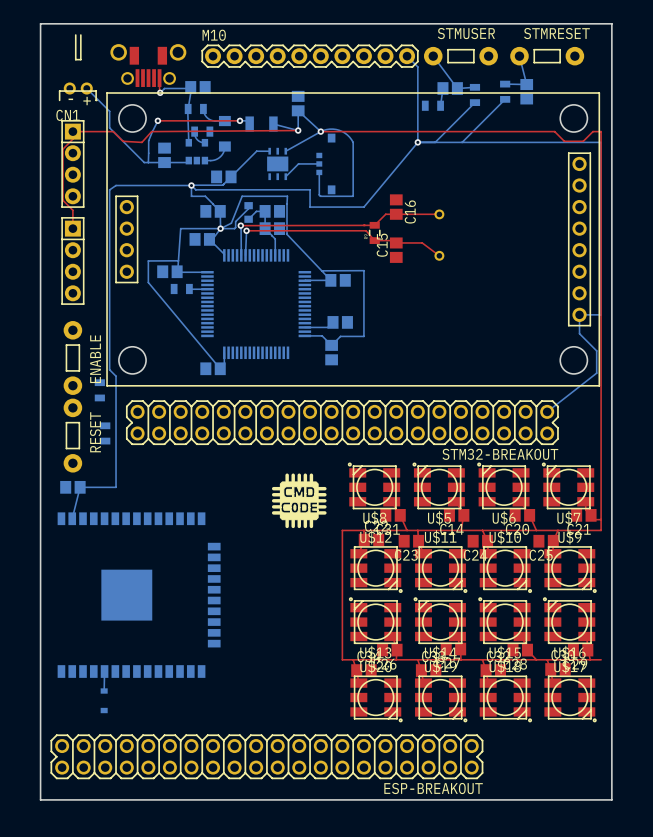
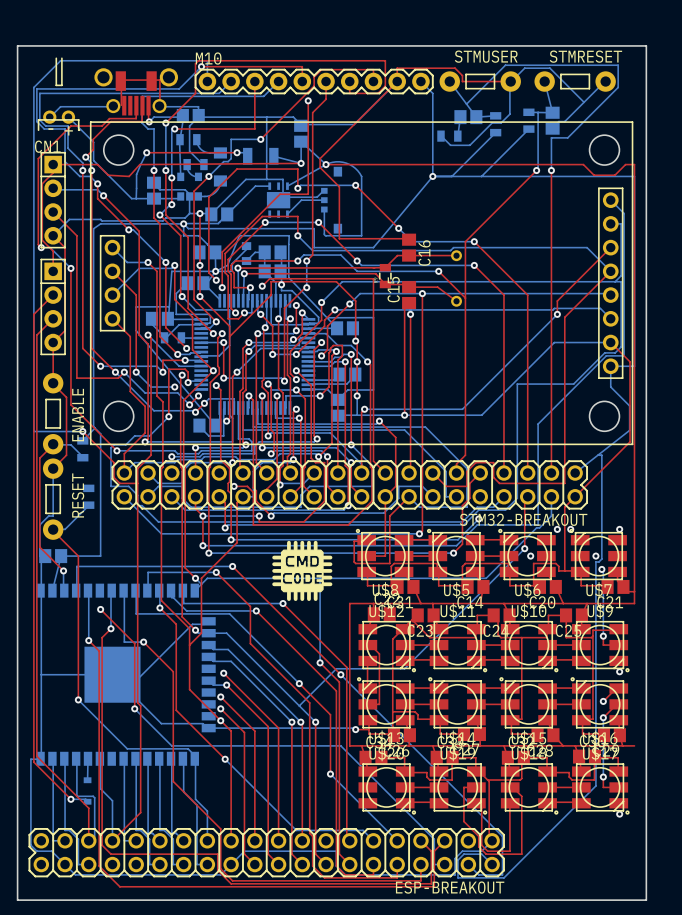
bottom track: none -> (201, 66) (179, 88) (36, 88) (36, 121) (44, 128) (65, 128) (65, 161) (79, 176) (90, 176) (97, 183)
top track: none -> (201, 66) (302, 66) (302, 81)
via: none -> (201, 66)
bottom track: none -> (207, 81) (207, 60) (60, 60) (33, 87) (33, 431) (82, 431)
bottom track: none -> (231, 81) (219, 93) (39, 93) (39, 120) (45, 126) (68, 126) (68, 148) (82, 163) (82, 170)
top track: none -> (254, 81) (254, 128) (174, 128)
bottom track: none -> (278, 81) (263, 96) (142, 96) (142, 123) (148, 128) (154, 128) (154, 170)
top track: none -> (326, 81) (326, 99) (312, 112) (312, 255) (306, 260)
top track: none -> (349, 81) (349, 93) (377, 93) (385, 85) (385, 60) (198, 60) (195, 63) (195, 93) (165, 123)
top track: none -> (373, 81) (373, 69) (321, 69) (314, 77) (314, 85) (260, 139)
bottom track: none -> (397, 81) (354, 124) (301, 125) (293, 117) (198, 115)
top track: none -> (510, 81) (462, 81) (462, 75) (455, 68) (397, 68) (397, 81) (320, 158) (320, 167) (339, 186) (339, 238) (409, 239)
bottom track: none -> (605, 81) (564, 121) (558, 121) (552, 128)
top track: none -> (308, 100) (308, 194) (280, 194) (222, 252) (222, 287)
via: none -> (308, 100)
bottom track: none -> (584, 102) (549, 68) (524, 68) (509, 81) (509, 114) (501, 123) (492, 123) (469, 145) (450, 145) (441, 136)
bottom track: none -> (466, 104) (505, 65) (618, 65) (618, 87) (567, 137) (551, 137) (551, 170)
top track: none -> (121, 105) (121, 80) (151, 81) (152, 80) (168, 80) (168, 77) (159, 80) (159, 105) (159, 106)
bottom track: none -> (113, 106) (60, 106) (49, 117)
top track: none -> (136, 105) (136, 118) (109, 118) (102, 126) (70, 126) (38, 158) (38, 244) (41, 247)
top track: none -> (142, 105) (142, 121) (111, 121) (93, 139) (93, 149) (85, 157)
bottom track: none -> (159, 106) (198, 106) (198, 115)
bottom track: none -> (538, 112) (536, 170)
bottom track: none -> (198, 115) (189, 126) (189, 151) (203, 164)
bottom track: none -> (266, 117) (266, 179)
bottom track: none -> (165, 123) (165, 170)
via: none -> (165, 123)
bottom track: none -> (174, 128) (171, 128) (171, 177)
via: none -> (174, 128)
bottom track: none -> (260, 139) (231, 139) (231, 158) (228, 161) (223, 161) (208, 176)
via: none -> (260, 139)
bottom track: none -> (85, 157) (91, 163) (91, 170)
via: none -> (85, 157)
top track: none -> (82, 170) (82, 348) (100, 366)
via: none -> (82, 170)
top track: none -> (91, 170) (91, 348) (115, 372)
via: none -> (91, 170)
top track: none -> (154, 170) (154, 217) (159, 223) (159, 336) (177, 354)
via: none -> (154, 170)
top track: none -> (165, 170) (165, 215) (188, 237) (188, 308) (213, 333)
via: none -> (165, 170)
top track: none -> (536, 170) (465, 241) (465, 455) (456, 464) (456, 473)
via: none -> (536, 170)
top track: none -> (551, 170) (551, 473)
via: none -> (551, 170)
top track: none -> (208, 176) (194, 191) (194, 299) (216, 321)
via: none -> (208, 176)
top track: none -> (171, 177) (171, 204)
via: none -> (171, 177)
bottom track: none -> (154, 182) (159, 189) (185, 189) (189, 194) (189, 213)
top track: none -> (97, 183) (97, 198) (128, 229)
via: none -> (97, 183)
bottom track: none -> (355, 185) (300, 185) (297, 188)
top track: none -> (355, 185) (398, 228)
via: none -> (355, 185)
bottom track: none -> (53, 188) (97, 189) (103, 195)
top track: none -> (297, 188) (297, 169) (237, 169) (208, 197) (208, 272) (216, 280)
via: none -> (297, 188)
bottom track: none -> (324, 190) (317, 197) (281, 197) (278, 200) (283, 197) (283, 179) (245, 179) (211, 214) (189, 213)
top track: none -> (103, 195) (139, 231) (139, 335) (148, 344) (148, 438) (145, 441)
via: none -> (103, 195)
bottom track: none -> (610, 200) (624, 213) (624, 355) (606, 355) (538, 424) (538, 524) (477, 524) (456, 545) (202, 545)
bottom track: none -> (171, 204) (159, 215)
via: none -> (171, 204)
top track: none -> (53, 212) (76, 235) (76, 378) (118, 378) (124, 372)
bottom track: none -> (189, 213) (185, 217) (165, 217) (162, 220) (69, 219) (53, 235)
top track: none -> (199, 213) (199, 296) (229, 326) (229, 418) (226, 421)
via: none -> (199, 213)
top track: none -> (159, 215) (180, 235) (182, 296)
via: none -> (159, 215)
bottom track: none -> (265, 222) (318, 222)
top track: none -> (265, 222) (228, 259) (228, 271) (231, 274) (231, 308) (235, 312)
via: none -> (265, 222)
top track: none -> (318, 222) (357, 260)
via: none -> (318, 222)
bottom track: none -> (610, 223) (621, 223) (621, 275) (615, 281)
bottom track: none -> (398, 228) (412, 241) (474, 241)
via: none -> (398, 228)
bottom track: none -> (128, 229) (133, 229) (165, 262)
via: none -> (128, 229)
top track: none -> (53, 235) (65, 247) (65, 330) (53, 342) (53, 384) (66, 397) (66, 455) (53, 468)
bottom track: none -> (297, 235) (312, 250) (587, 247) (610, 271)
top track: none -> (297, 235) (297, 216) (262, 216) (225, 253) (225, 272) (228, 275) (228, 318) (238, 318) (244, 312)
via: none -> (297, 235)
top track: none -> (474, 241) (527, 295) (527, 473)
via: none -> (474, 241)
bottom track: none -> (41, 247) (50, 247) (70, 268)
via: none -> (41, 247)
bottom track: none -> (112, 247) (127, 262) (148, 262)
top track: none -> (610, 247) (557, 301) (557, 314)
bottom track: none -> (280, 252) (281, 290) (291, 290) (318, 317) (318, 323) (271, 324) (271, 300)
bottom track: none -> (297, 260) (303, 255) (340, 255) (357, 271) (438, 271)
top track: none -> (297, 260) (235, 260) (231, 265) (231, 269) (234, 272) (234, 287) (250, 287)
via: none -> (297, 260)
bottom track: none -> (306, 260) (306, 287)
via: none -> (306, 260)
bottom track: none -> (357, 260) (361, 265) (474, 265)
via: none -> (357, 260)
top track: none -> (148, 262) (156, 271) (156, 395) (162, 401) (161, 600) (189, 628) (189, 689) (231, 731) (231, 840)
via: none -> (148, 262)
top track: none -> (165, 262) (165, 327) (186, 348)
via: none -> (165, 262)
bottom track: none -> (174, 265) (171, 268) (139, 268) (112, 295)
top track: none -> (174, 265) (174, 299) (192, 317) (192, 349) (213, 370) (183, 400) (185, 567) (195, 578)
via: none -> (174, 265)
via: none -> (199, 265)
top track: none -> (474, 265) (503, 295) (503, 473)
via: none -> (474, 265)
top track: none -> (70, 268) (70, 404) (116, 450)
via: none -> (70, 268)
top track: none -> (112, 271) (136, 295) (136, 372)
top track: none -> (438, 271) (465, 298)
via: none -> (438, 271)
top track: none -> (610, 271) (564, 317) (564, 483) (499, 483) (493, 477) (493, 462) (475, 462) (466, 471) (466, 486) (446, 486) (432, 473)
via: none -> (216, 280)
bottom track: none -> (187, 283) (176, 293) (176, 314) (208, 314) (210, 323) (179, 324) (164, 337) (152, 324) (152, 318)
via: none -> (281, 284)
top track: none -> (262, 286) (269, 278) (373, 278) (373, 461) (385, 473)
via: none -> (262, 286)
via: none -> (222, 287)
bottom track: none -> (250, 287) (247, 300)
via: none -> (250, 287)
top track: none -> (306, 287) (284, 308) (284, 381)
via: none -> (306, 287)
top track: none -> (422, 293) (422, 530) (419, 533)
via: none -> (422, 293)
top track: none -> (53, 295) (33, 314) (33, 762) (70, 799)
bottom track: none -> (610, 295) (360, 293) (349, 303)
bottom track: none -> (182, 296) (195, 309) (229, 309) (229, 345) (219, 355) (201, 356)
via: none -> (182, 296)
via: none -> (199, 296)
bottom track: none -> (252, 300) (251, 312) (244, 312)
bottom track: none -> (257, 300) (257, 314) (260, 314)
bottom track: none -> (266, 300) (265, 327)
bottom track: none -> (280, 300) (278, 318)
bottom track: none -> (285, 300) (285, 318) (290, 318)
bottom track: none -> (321, 302) (342, 281) (621, 281) (621, 346) (615, 352) (604, 352) (573, 384) (517, 384) (517, 498) (505, 510) (478, 510) (463, 524) (228, 524) (225, 527)
top track: none -> (321, 302) (321, 320) (290, 351) (290, 373) (296, 379)
via: none -> (321, 302)
top track: none -> (409, 303) (404, 308) (404, 415)
top track: none -> (349, 303) (327, 326) (327, 349) (321, 355)
via: none -> (349, 303)
top track: none -> (296, 305) (296, 330)
via: none -> (296, 305)
bottom track: none -> (334, 309) (600, 308) (610, 318)
top track: none -> (334, 309) (324, 320) (324, 326) (296, 354)
via: none -> (334, 309)
via: none -> (235, 312)
via: none -> (244, 312)
bottom track: none -> (302, 312) (308, 319)
top track: none -> (302, 312) (302, 333) (296, 339) (293, 339)
via: none -> (302, 312)
top track: none -> (260, 314) (272, 326) (272, 354)
via: none -> (260, 314)
top track: none -> (410, 314) (409, 473)
via: none -> (410, 314)
bottom track: none -> (557, 314) (462, 409) (364, 409)
via: none -> (557, 314)
top track: none -> (53, 318) (36, 335) (36, 756) (88, 808) (88, 840)
top track: none -> (112, 318) (130, 336) (130, 391) (145, 406) (145, 433) (124, 453) (124, 473)
top track: none -> (278, 318) (278, 388) (283, 392) (283, 465) (280, 468) (280, 484)
via: none -> (278, 318)
top track: none -> (290, 318) (287, 321) (287, 375) (290, 378) (290, 453) (287, 456) (287, 470) (290, 473)
via: none -> (290, 318)
bottom track: none -> (216, 321) (210, 327) (201, 328)
via: none -> (216, 321)
top track: none -> (265, 327) (262, 387) (268, 392) (268, 435)
via: none -> (265, 327)
bottom track: none -> (296, 330) (293, 333) (257, 333)
via: none -> (296, 330)
bottom track: none -> (308, 333) (326, 333) (337, 345) (351, 345) (367, 361)
via: none -> (213, 333)
top track: none -> (222, 333) (217, 338) (219, 373) (210, 382) (208, 553)
via: none -> (222, 333)
top track: none -> (257, 333) (256, 462) (266, 473)
via: none -> (257, 333)
bottom track: none -> (148, 335) (179, 366) (201, 366)
top track: none -> (148, 335) (151, 338) (151, 455) (137, 468) (137, 702) (140, 705) (140, 812) (112, 840)
via: none -> (148, 335)
top track: none -> (229, 336) (271, 295) (271, 281) (336, 281) (355, 301) (357, 395)
bottom track: none -> (308, 338) (300, 338) (299, 345) (254, 345) (248, 351)
bottom track: none -> (293, 339) (290, 342) (248, 342)
via: none -> (293, 339)
via: none -> (355, 341)
bottom track: none -> (223, 342) (201, 342)
top track: none -> (223, 342) (223, 378)
via: none -> (223, 342)
top track: none -> (248, 342) (242, 348) (242, 388) (240, 391) (240, 470) (242, 473)
via: none -> (248, 342)
top track: none -> (321, 342) (314, 349) (314, 435) (317, 438)
via: none -> (321, 342)
bottom track: none -> (610, 342) (554, 342) (481, 415) (337, 415)
top track: none -> (610, 342) (630, 361) (630, 441) (564, 507) (564, 570)
bottom track: none -> (308, 347) (260, 348) (237, 372)
via: none -> (186, 348)
bottom track: none -> (201, 352) (177, 354)
top track: none -> (248, 351) (245, 354) (245, 389) (242, 392) (242, 441) (245, 444)
via: none -> (248, 351)
bottom track: none -> (336, 351) (318, 349) (308, 352)
top track: none -> (336, 351) (331, 355) (331, 443) (318, 456)
via: none -> (336, 351)
via: none -> (177, 354)
bottom track: none -> (272, 354) (296, 354)
via: none -> (272, 354)
via: none -> (296, 354)
bottom track: none -> (351, 354) (334, 357) (330, 361) (308, 361)
top track: none -> (351, 354) (351, 444)
via: none -> (351, 354)
via: none -> (321, 355)
bottom track: none -> (185, 360) (201, 361)
top track: none -> (185, 360) (162, 360) (162, 372)
via: none -> (185, 360)
bottom track: none -> (345, 361) (334, 361) (330, 366) (308, 366)
top track: none -> (345, 361) (345, 465) (348, 468) (348, 505)
via: none -> (345, 361)
bottom track: none -> (357, 361) (357, 373) (346, 384) (308, 384)
via: none -> (357, 361)
top track: none -> (367, 361) (370, 364) (372, 501) (348, 524) (253, 524) (253, 492) (247, 486) (234, 486)
via: none -> (367, 361)
bottom track: none -> (100, 366) (156, 366) (162, 372)
via: none -> (100, 366)
via: none -> (213, 370)
top track: none -> (296, 370) (311, 385) (311, 458) (315, 462) (324, 462) (324, 501) (303, 521) (259, 521) (259, 516)
via: none -> (296, 370)
bottom track: none -> (115, 372) (154, 410) (195, 412)
via: none -> (115, 372)
bottom track: none -> (124, 372) (145, 392) (177, 392) (189, 404)
via: none -> (124, 372)
bottom track: none -> (136, 372) (151, 387) (174, 387)
via: none -> (136, 372)
via: none -> (162, 372)
top track: none -> (237, 372) (232, 376) (232, 462)
via: none -> (237, 372)
top track: none -> (182, 375) (182, 616) (195, 630)
via: none -> (182, 375)
bottom track: none -> (223, 378) (281, 378) (284, 381)
via: none -> (223, 378)
via: none -> (296, 379)
bottom track: none -> (201, 380) (188, 382)
via: none -> (284, 381)
top track: none -> (188, 382) (188, 372) (185, 369) (168, 369) (168, 416)
via: none -> (188, 382)
top track: none -> (268, 384) (271, 387) (271, 430) (274, 433) (274, 450) (271, 453)
via: none -> (268, 384)
top track: none -> (216, 385) (220, 389) (220, 459) (229, 468) (228, 490) (231, 493) (231, 539)
via: none -> (216, 385)
via: none -> (174, 387)
bottom track: none -> (296, 389) (271, 389) (271, 408)
top track: none -> (296, 389) (305, 398) (303, 486) (314, 496)
via: none -> (296, 389)
top track: none -> (198, 395) (189, 404)
via: none -> (198, 395)
bottom track: none -> (248, 395) (247, 408)
top track: none -> (248, 395) (253, 400) (253, 487) (256, 490) (256, 501) (271, 516)
via: none -> (248, 395)
top track: none -> (262, 395) (262, 447)
via: none -> (262, 395)
top track: none -> (277, 395) (277, 478) (266, 489) (266, 496)
via: none -> (277, 395)
bottom track: none -> (320, 395) (285, 395) (285, 408)
top track: none -> (320, 395) (328, 387) (330, 348) (333, 345) (342, 345) (342, 355) (337, 360) (337, 473)
via: none -> (320, 395)
bottom track: none -> (357, 395) (357, 415)
via: none -> (357, 395)
bottom track: none -> (204, 403) (208, 398) (234, 398) (233, 408)
top track: none -> (204, 403) (195, 412)
via: none -> (204, 403)
via: none -> (189, 404)
bottom track: none -> (224, 408) (223, 435) (208, 435) (199, 425)
bottom track: none -> (229, 408) (229, 415) (232, 418) (232, 441) (145, 441)
bottom track: none -> (238, 408) (238, 438) (248, 438) (251, 441) (251, 450) (201, 450) (198, 453) (177, 453) (174, 450) (116, 450)
bottom track: none -> (243, 408) (242, 430) (404, 430) (446, 471) (446, 496) (456, 496)
bottom track: none -> (252, 408) (253, 427) (425, 427) (466, 468) (466, 507) (419, 507) (409, 496)
bottom track: none -> (257, 408) (257, 424) (376, 424) (379, 421)
bottom track: none -> (275, 408) (275, 418) (299, 418)
top track: none -> (296, 409) (293, 412) (293, 459)
via: none -> (296, 409)
top track: none -> (364, 409) (361, 412) (361, 473)
via: none -> (364, 409)
via: none -> (195, 412)
via: none -> (404, 415)
bottom track: none -> (168, 416) (149, 435) (134, 435) (125, 444) (113, 444) (111, 447) (111, 486) (128, 486) (137, 495) (137, 505) (142, 505) (158, 521) (462, 521) (477, 507) (493, 507) (503, 496)
via: none -> (168, 416)
top track: none -> (299, 418) (300, 486) (290, 496)
via: none -> (299, 418)
via: none -> (226, 421)
top track: none -> (379, 421) (395, 437) (395, 486) (385, 496) (385, 556) (366, 556)
via: none -> (379, 421)
bottom track: none -> (95, 428) (82, 440)
top track: none -> (82, 431) (113, 462) (113, 477) (119, 483) (137, 483)
via: none -> (82, 431)
bottom track: none -> (268, 435) (271, 433) (330, 433) (361, 464) (361, 473)
via: none -> (268, 435)
bottom track: none -> (317, 438) (314, 441) (259, 441) (254, 446) (254, 453) (202, 453) (199, 456) (171, 456)
via: none -> (317, 438)
via: none -> (145, 441)
bottom track: none -> (53, 444) (70, 444) (82, 457)
top track: none -> (53, 444) (39, 458) (39, 547) (63, 570)
bottom track: none -> (245, 444) (242, 447) (195, 447)
via: none -> (245, 444)
bottom track: none -> (351, 444) (372, 465) (372, 486) (309, 486) (300, 495) (300, 507) (191, 507) (182, 498) (182, 486) (158, 486) (148, 496)
via: none -> (351, 444)
top track: none -> (195, 447) (195, 473)
via: none -> (195, 447)
bottom track: none -> (262, 447) (336, 447) (351, 462)
via: none -> (262, 447)
via: none -> (116, 450)
bottom track: none -> (271, 453) (274, 450) (321, 450) (327, 456)
via: none -> (271, 453)
bottom track: none -> (598, 454) (601, 455) (601, 559) (595, 562) (595, 785) (503, 877) (458, 877) (458, 860) (463, 854) (481, 854) (492, 864)
via: none -> (171, 456)
bottom track: none -> (318, 456) (315, 453) (280, 453) (274, 459) (238, 459) (235, 456) (204, 456) (201, 459) (177, 459) (174, 462) (134, 462) (124, 473)
via: none -> (318, 456)
top track: none -> (327, 456) (327, 486) (337, 496)
via: none -> (327, 456)
bottom track: none -> (293, 459) (290, 462) (262, 462) (253, 471) (253, 496) (242, 496)
via: none -> (293, 459)
bottom track: none -> (232, 462) (191, 462) (182, 471) (182, 483) (158, 483) (148, 473)
via: none -> (232, 462)
top track: none -> (351, 462) (351, 486) (361, 496)
via: none -> (351, 462)
bottom track: none -> (53, 468) (53, 516) (48, 516) (39, 524) (39, 556) (45, 556)
bottom track: none -> (314, 473) (303, 483) (280, 484)
top track: none -> (480, 473) (469, 483) (469, 498) (462, 505) (462, 544) (453, 553)
via: none -> (280, 484)
via: none -> (234, 486)
bottom track: none -> (124, 496) (161, 533) (419, 533)
bottom track: none -> (171, 496) (185, 510) (343, 510) (348, 505)
top track: none -> (195, 496) (195, 508) (202, 516) (202, 545)
top track: none -> (219, 496) (225, 502) (225, 527)
top track: none -> (242, 496) (237, 502) (237, 542) (201, 578) (201, 633) (189, 645)
top track: none -> (409, 496) (389, 516) (389, 563) (354, 562) (354, 541) (366, 540)
bottom track: none -> (432, 496) (422, 486) (398, 486) (398, 498) (383, 513) (274, 513) (271, 516)
top track: none -> (527, 496) (524, 499) (524, 548)
bottom track: none -> (551, 496) (551, 516) (539, 527) (536, 527) (486, 578) (207, 578) (194, 590)
bottom track: none -> (88, 505) (65, 529) (53, 529)
via: none -> (348, 505)
bottom track: none -> (202, 516) (259, 516)
via: none -> (202, 516)
via: none -> (259, 516)
via: none -> (271, 516)
bottom track: none -> (478, 519) (458, 539) (231, 539)
via: none -> (478, 519)
via: none -> (225, 527)
top track: none -> (53, 529) (78, 556) (78, 699)
via: none -> (557, 529)
via: none -> (570, 529)
via: none -> (619, 529)
via: none -> (419, 533)
via: none -> (231, 539)
top track: none -> (404, 540) (437, 540)
top track: none -> (475, 540) (509, 540)
via: none -> (202, 545)
bottom track: none -> (524, 548) (404, 668) (336, 668) (299, 705)
via: none -> (524, 548)
bottom track: none -> (208, 553) (453, 553)
via: none -> (208, 553)
via: none -> (453, 553)
bottom track: none -> (41, 556) (41, 757) (30, 759) (30, 845) (36, 851) (51, 851) (75, 874) (220, 874) (244, 851) (336, 851) (336, 866) (345, 874) (455, 874) (455, 858) (462, 851) (481, 851) (492, 840)
top track: none -> (404, 556) (437, 556)
top track: none -> (475, 556) (509, 556)
via: none -> (530, 556)
via: none -> (595, 556)
bottom track: none -> (232, 566) (76, 566) (76, 590)
top track: none -> (232, 566) (340, 674)
via: none -> (232, 566)
bottom track: none -> (601, 569) (603, 636)
via: none -> (601, 569)
bottom track: none -> (63, 570) (64, 590)
via: none -> (63, 570)
top track: none -> (366, 571) (367, 585) (397, 586)
bottom track: none -> (216, 572) (148, 572) (147, 590)
top track: none -> (216, 572) (250, 606) (250, 643) (309, 702) (309, 833) (312, 836) (312, 866) (324, 877) (397, 877) (397, 864)
via: none -> (216, 572)
bottom track: none -> (195, 578) (201, 584)
via: none -> (195, 578)
bottom track: none -> (320, 578) (320, 662)
top track: none -> (391, 585) (391, 566) (394, 563) (437, 563) (438, 585) (467, 586) (462, 585) (462, 566) (465, 563) (508, 563) (509, 585) (539, 586)
top track: none -> (533, 585) (533, 563) (555, 563) (558, 566) (558, 570) (579, 570) (581, 585) (607, 586)
bottom track: none -> (88, 590) (88, 640)
bottom track: none -> (111, 590) (111, 628)
bottom track: none -> (123, 590) (124, 642) (143, 642)
bottom track: none -> (135, 590) (136, 613) (229, 613) (299, 683)
bottom track: none -> (159, 590) (159, 607)
bottom track: none -> (171, 590) (171, 597) (186, 610) (256, 610)
bottom track: none -> (182, 590) (183, 603) (283, 603)
top track: none -> (283, 603) (346, 667) (346, 837) (349, 840)
via: none -> (283, 603)
top track: none -> (159, 607) (176, 624) (176, 710) (225, 759)
via: none -> (159, 607)
top track: none -> (100, 609) (134, 643) (134, 708)
via: none -> (100, 609)
top track: none -> (256, 610) (336, 691) (336, 866) (345, 874) (373, 874) (373, 864)
via: none -> (256, 610)
bottom track: none -> (208, 621) (204, 624) (192, 624) (127, 689)
top track: none -> (111, 628) (102, 637) (102, 845) (111, 854) (217, 854) (217, 870) (231, 883) (431, 883) (431, 851) (420, 840)
via: none -> (111, 628)
top track: none -> (618, 629) (592, 630) (592, 719) (581, 720) (582, 734) (604, 735)
bottom track: none -> (195, 630) (198, 633) (226, 633) (315, 722)
via: none -> (195, 630)
top track: none -> (592, 636) (566, 637) (566, 615) (548, 615) (546, 637) (501, 637) (498, 634) (498, 618) (495, 615) (477, 615) (475, 637) (429, 637) (412, 619) (417, 615) (416, 615) (406, 625) (406, 628) (403, 628) (392, 639) (392, 734)
top track: none -> (603, 636) (603, 645) (618, 645)
via: none -> (603, 636)
top track: none -> (521, 637) (521, 719) (510, 720) (511, 734) (537, 735)
top track: none -> (88, 640) (99, 650) (99, 866) (119, 886) (434, 886) (434, 851) (444, 840)
via: none -> (88, 640)
top track: none -> (143, 642) (173, 671) (173, 781) (220, 828) (220, 868) (232, 880) (420, 880) (420, 864)
via: none -> (143, 642)
bottom track: none -> (208, 645) (213, 649) (228, 649) (300, 722)
top track: none -> (367, 645) (370, 645) (379, 653) (379, 704) (367, 704)
top track: none -> (405, 645) (439, 645)
top track: none -> (476, 645) (510, 645)
top track: none -> (547, 645) (581, 645)
bottom track: none -> (208, 656) (213, 661) (231, 661) (291, 722)
top track: none -> (367, 660) (367, 688)
top track: none -> (405, 660) (439, 660)
top track: none -> (476, 660) (510, 660)
top track: none -> (547, 660) (581, 660)
top track: none -> (320, 662) (339, 682) (339, 854) (349, 864)
via: none -> (320, 662)
via: none -> (619, 671)
top track: none -> (223, 673) (278, 728) (278, 840)
via: none -> (223, 673)
bottom track: none -> (41, 674) (112, 674) (161, 723) (202, 723) (207, 728) (355, 729)
bottom track: none -> (340, 674) (502, 836) (502, 874) (478, 874) (468, 864)
via: none -> (340, 674)
bottom track: none -> (208, 680) (213, 685) (226, 685)
top track: none -> (299, 683) (330, 714) (330, 774)
via: none -> (299, 683)
top track: none -> (226, 685) (268, 726) (268, 854) (278, 864)
via: none -> (226, 685)
top track: none -> (405, 688) (439, 688)
top track: none -> (476, 688) (510, 688)
top track: none -> (547, 688) (581, 688)
top track: none -> (618, 688) (603, 701)
top track: none -> (220, 696) (254, 731) (254, 840)
via: none -> (220, 696)
bottom track: none -> (78, 699) (127, 748) (188, 748) (194, 754) (195, 799) (207, 811) (207, 840)
via: none -> (78, 699)
via: none -> (603, 701)
top track: none -> (405, 704) (439, 704)
top track: none -> (476, 704) (510, 704)
top track: none -> (547, 704) (581, 704)
top track: none -> (618, 704) (603, 717)
bottom track: none -> (134, 708) (171, 745) (340, 745) (434, 839) (434, 864) (444, 864)
via: none -> (134, 708)
top track: none -> (220, 708) (244, 732) (244, 854) (254, 864)
via: none -> (220, 708)
top track: none -> (392, 711) (415, 711) (417, 714) (417, 719) (438, 719) (440, 734) (464, 734)
bottom track: none -> (603, 717) (603, 777)
via: none -> (603, 717)
via: none -> (220, 720)
top track: none -> (367, 720) (369, 734) (392, 734)
top track: none -> (291, 722) (291, 854) (302, 864)
via: none -> (291, 722)
top track: none -> (300, 722) (302, 840)
via: none -> (300, 722)
top track: none -> (315, 722) (315, 854) (326, 864)
via: none -> (315, 722)
top track: none -> (355, 729) (369, 729)
via: none -> (355, 729)
top track: none -> (381, 757) (404, 757) (406, 772) (426, 772) (426, 777) (429, 780) (452, 780) (452, 757) (475, 757) (475, 771) (476, 771) (475, 768) (489, 781) (489, 837) (492, 840)
bottom track: none -> (52, 758) (53, 840) (65, 840)
bottom track: none -> (64, 758) (65, 830) (69, 830) (78, 839) (78, 864) (88, 864)
bottom track: none -> (76, 758) (76, 796) (94, 797) (94, 840) (88, 840)
bottom track: none -> (99, 758) (100, 788) (112, 800) (112, 840)
bottom track: none -> (123, 758) (124, 840) (136, 840)
bottom track: none -> (135, 758) (136, 830) (140, 830) (149, 839) (149, 864) (159, 864)
bottom track: none -> (147, 758) (148, 833) (152, 833) (159, 840)
bottom track: none -> (159, 758) (159, 830) (164, 830) (173, 839) (173, 864) (183, 864)
bottom track: none -> (171, 758) (171, 833) (176, 833) (183, 840)
bottom track: none -> (182, 758) (183, 791) (197, 805) (197, 864) (207, 864)
bottom track: none -> (225, 759) (296, 830) (363, 830) (373, 840)
via: none -> (225, 759)
top track: none -> (618, 771) (618, 757) (594, 756) (594, 780) (572, 780) (569, 777) (569, 772) (548, 772) (546, 757) (523, 757) (520, 780) (487, 780)
bottom track: none -> (330, 774) (397, 840)
via: none -> (330, 774)
top track: none -> (603, 777) (603, 787) (618, 787)
via: none -> (603, 777)
top track: none -> (405, 787) (439, 787)
top track: none -> (476, 787) (463, 787) (463, 821) (478, 836) (478, 846) (486, 854) (521, 854) (521, 796) (512, 787) (510, 787)
top track: none -> (547, 787) (581, 787)
bottom track: none -> (70, 799) (85, 799) (87, 801)
via: none -> (70, 799)
top track: none -> (405, 803) (439, 803)
top track: none -> (476, 803) (481, 808) (481, 845) (487, 851) (509, 851) (510, 803)
top track: none -> (547, 803) (581, 803)
via: none -> (619, 814)

